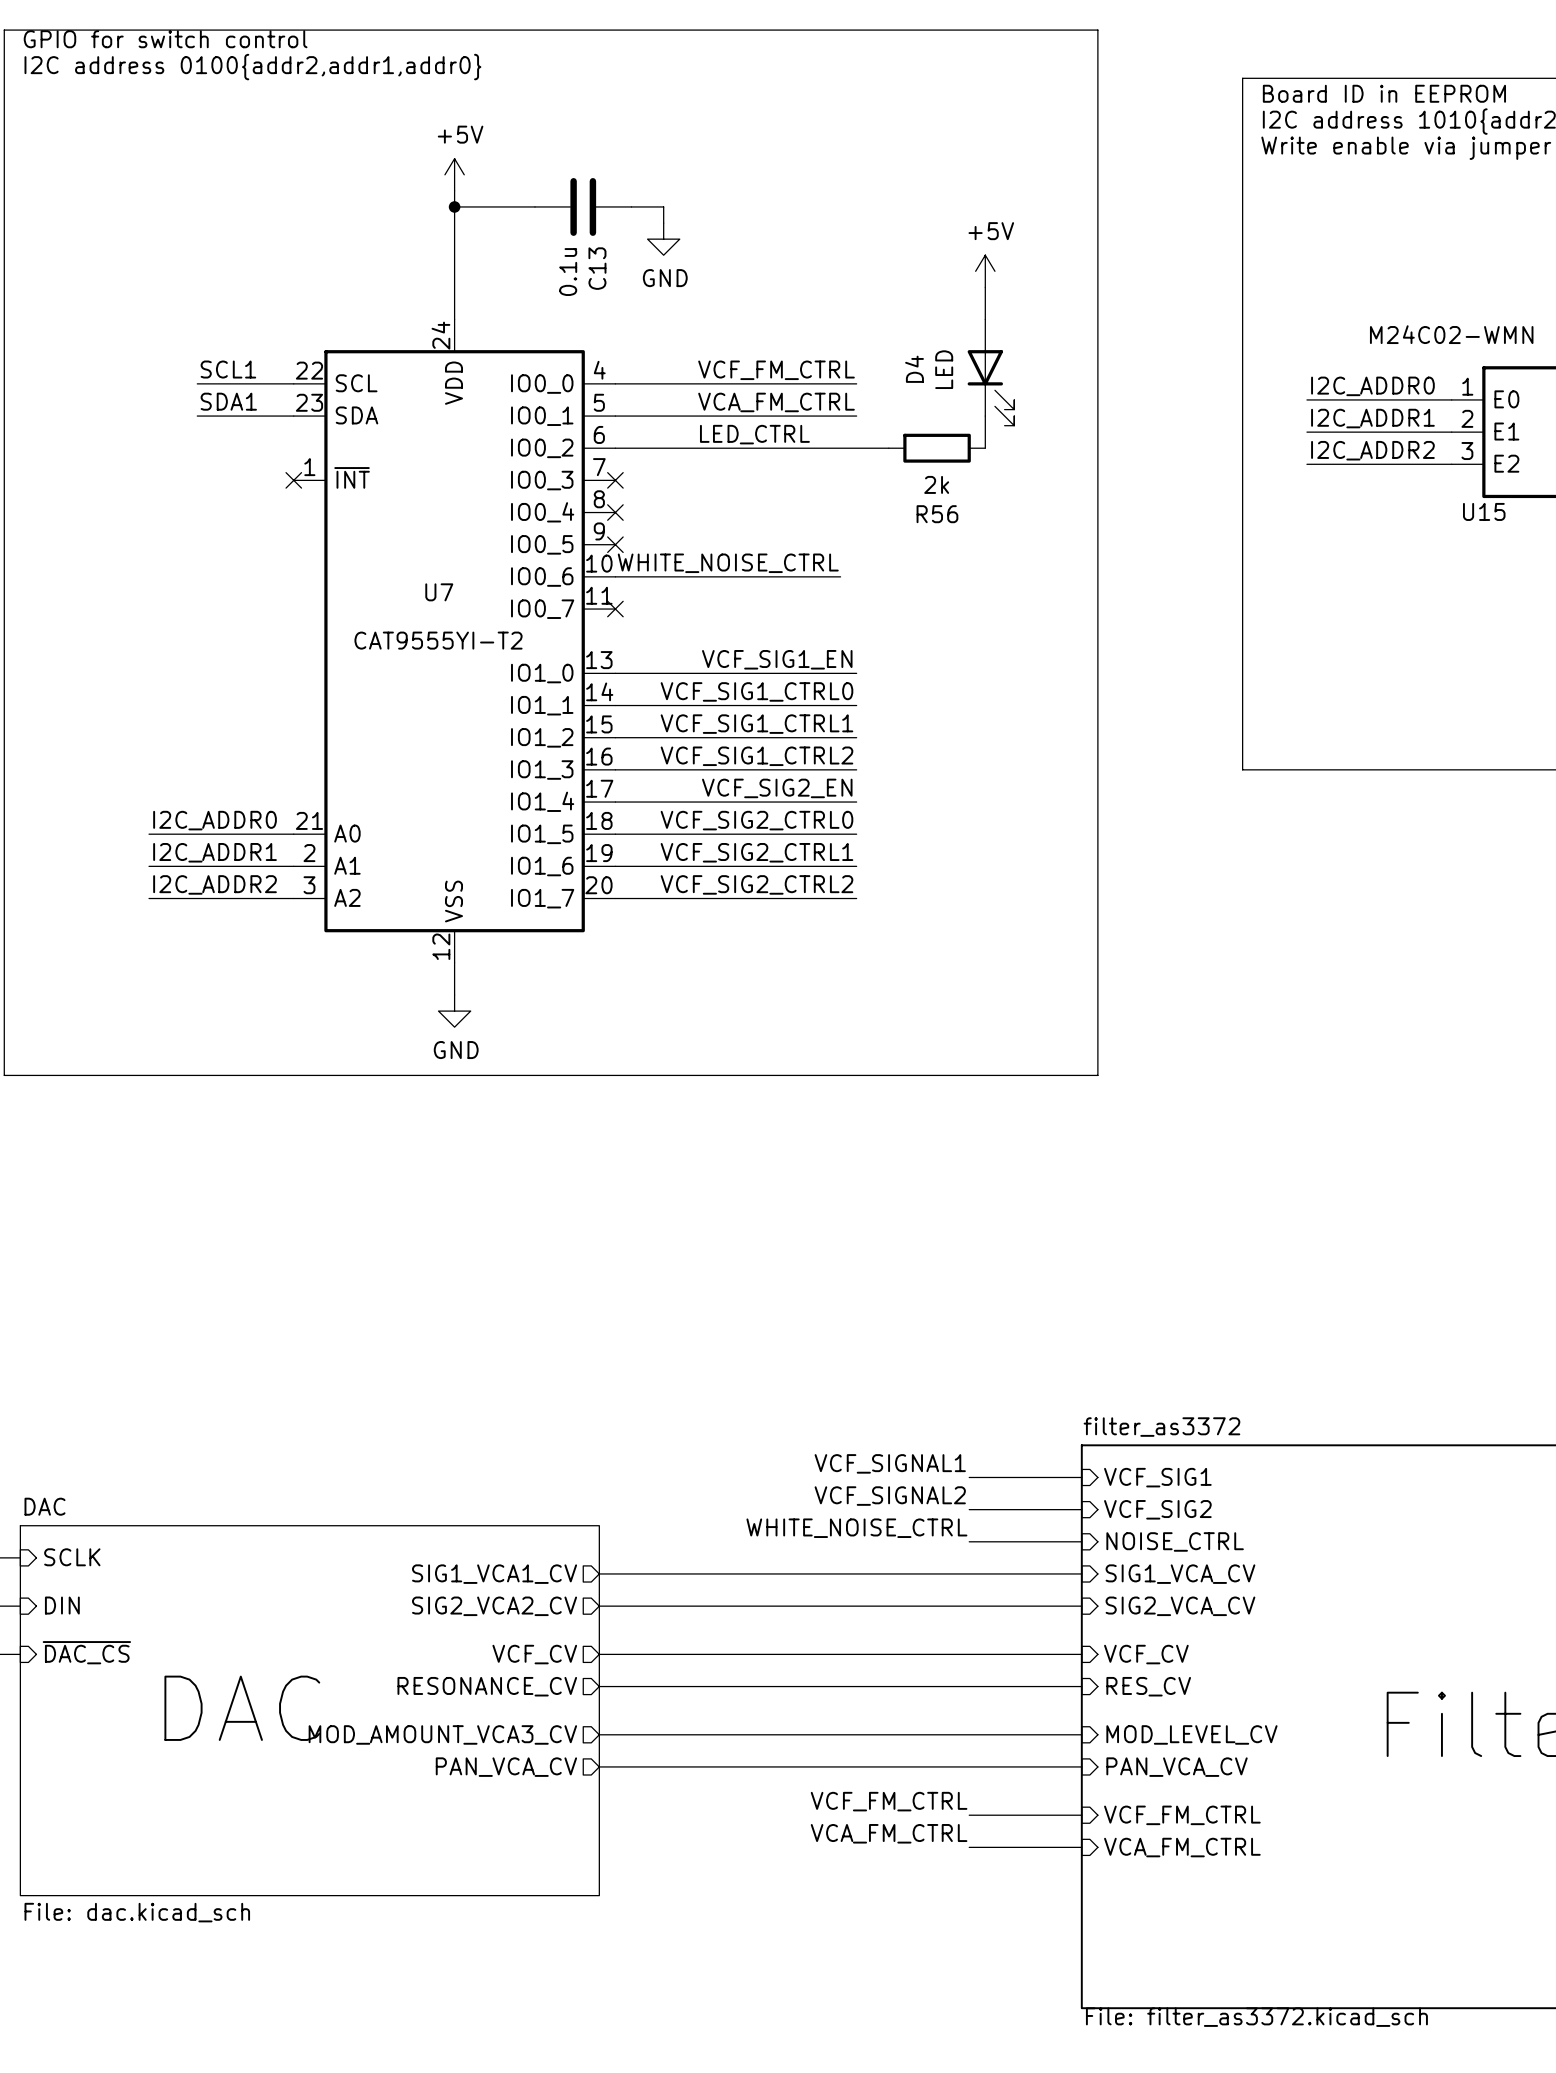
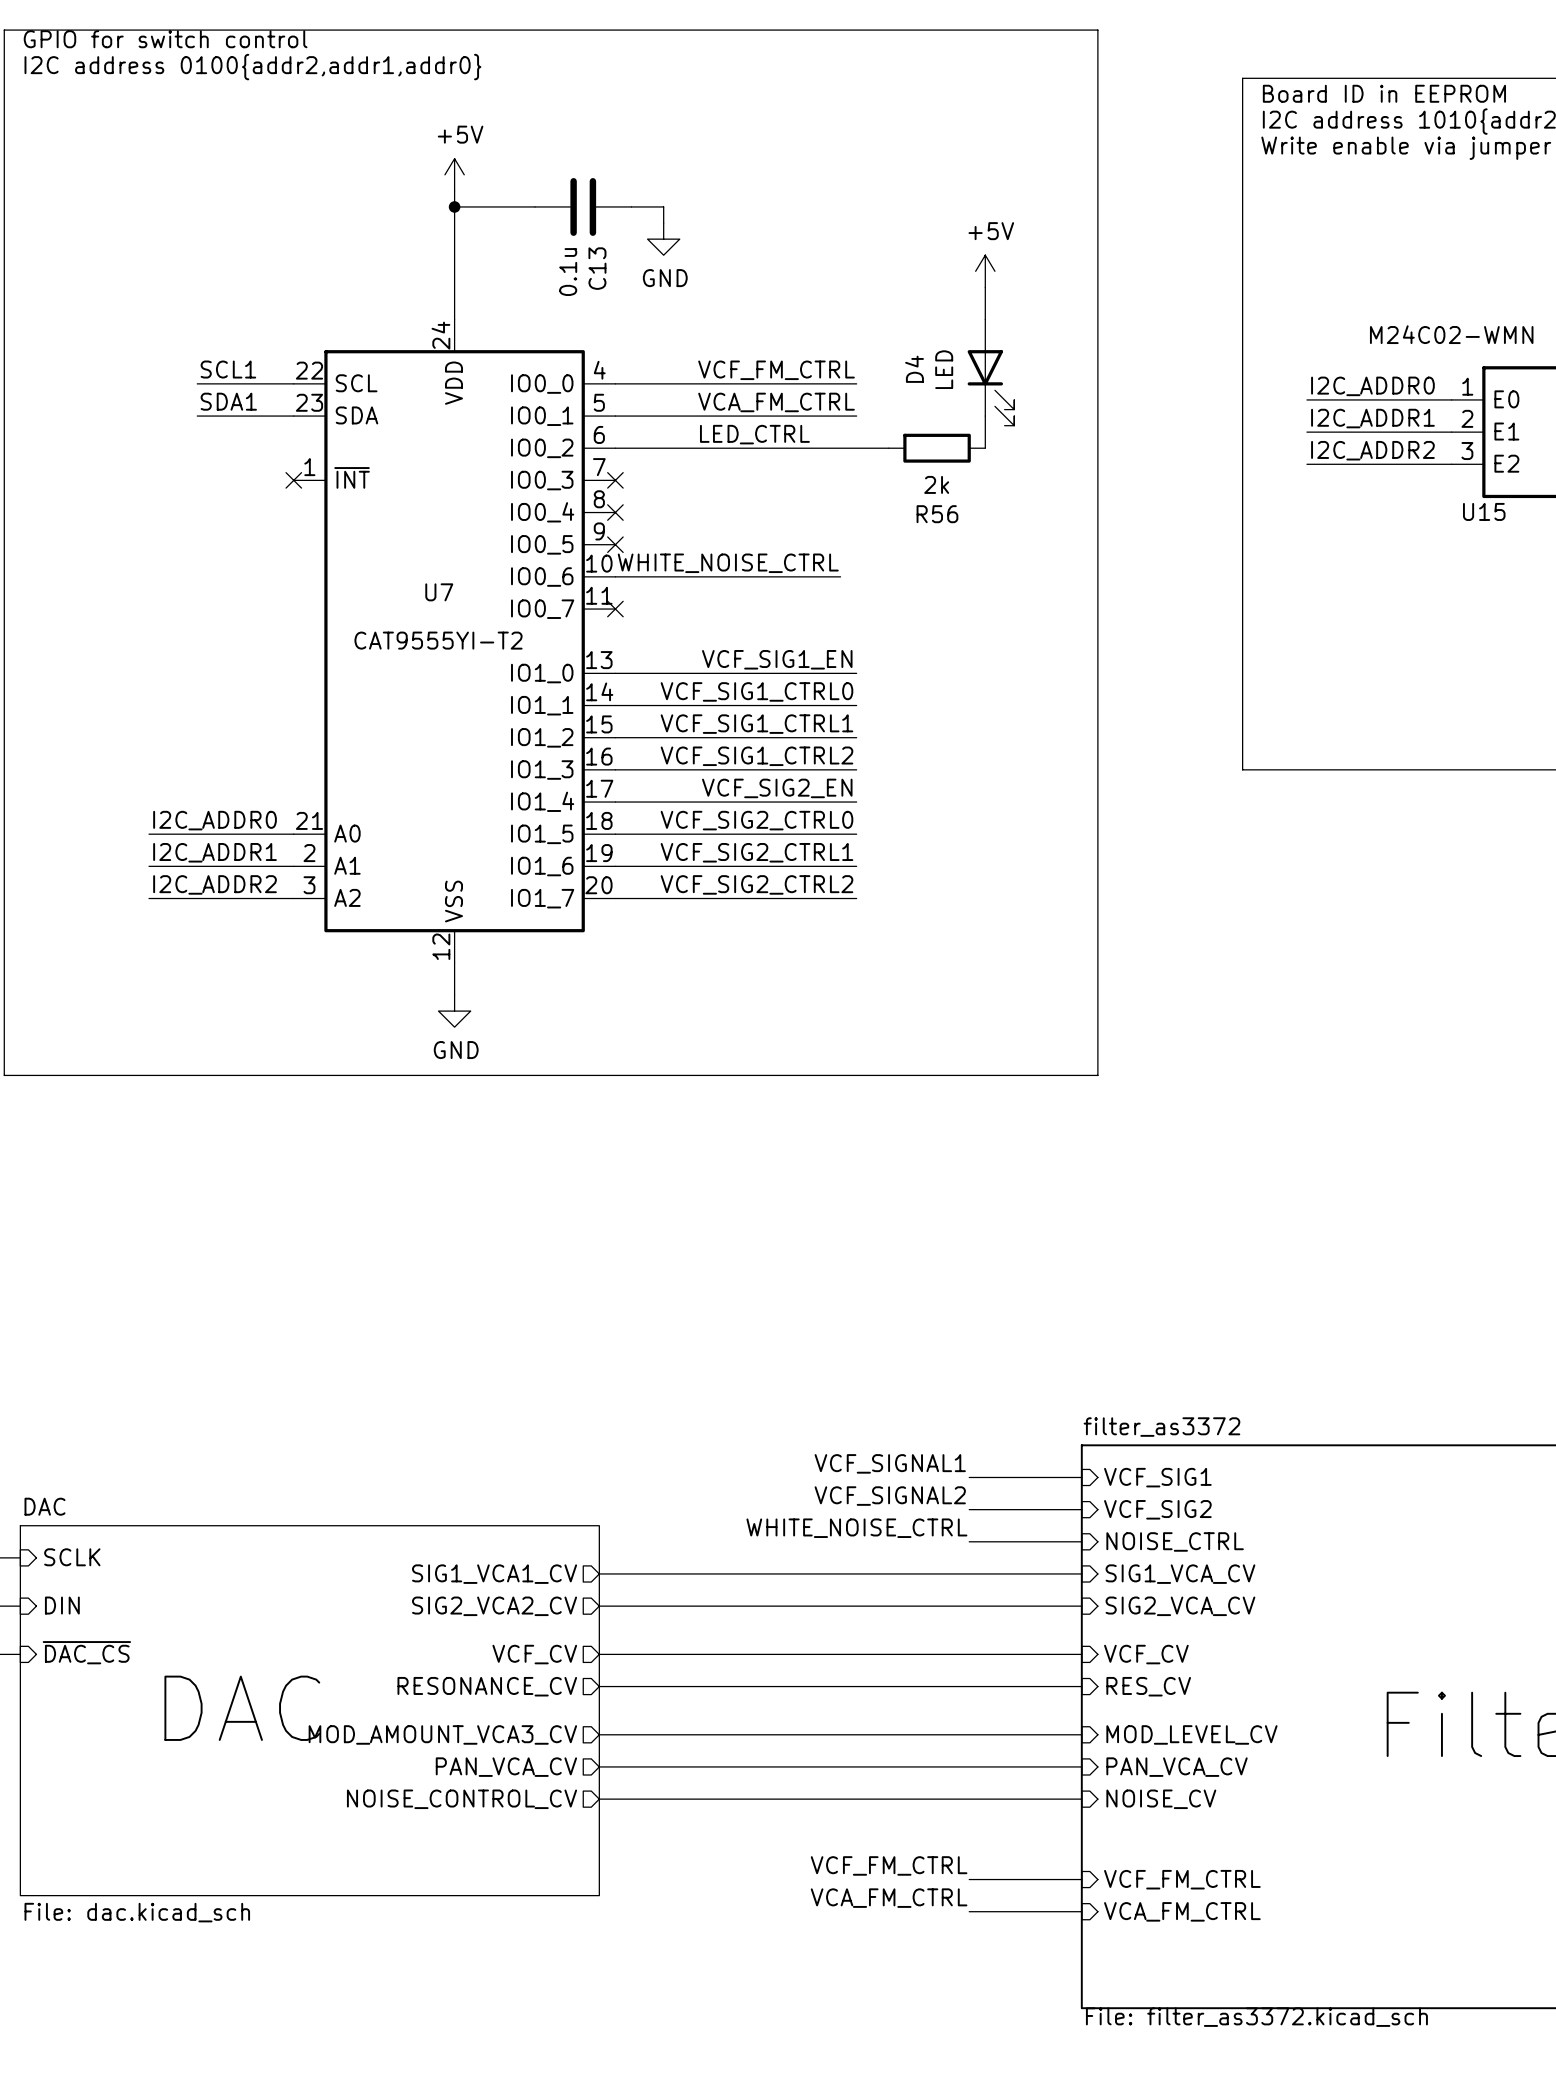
sheet pin: none -> NOISE_CONTROL_CV (462, 1799)
wire: none -> (599, 1799) (1081, 1799)
sheet pin: none -> NOISE_CV (1161, 1799)
label position: VCF_FM_CTRL (889, 1801) -> VCF_FM_CTRL (889, 1865)
wire: (969, 1815) (1081, 1815) -> (969, 1911) (1081, 1911)
sheet pin position: VCF_FM_CTRL (1182, 1815) -> VCF_FM_CTRL (1182, 1879)
label position: VCA_FM_CTRL (889, 1833) -> VCA_FM_CTRL (889, 1898)
wire: (969, 1847) (1081, 1847) -> (969, 1879) (1081, 1879)
sheet pin position: VCA_FM_CTRL (1182, 1847) -> VCA_FM_CTRL (1182, 1911)

